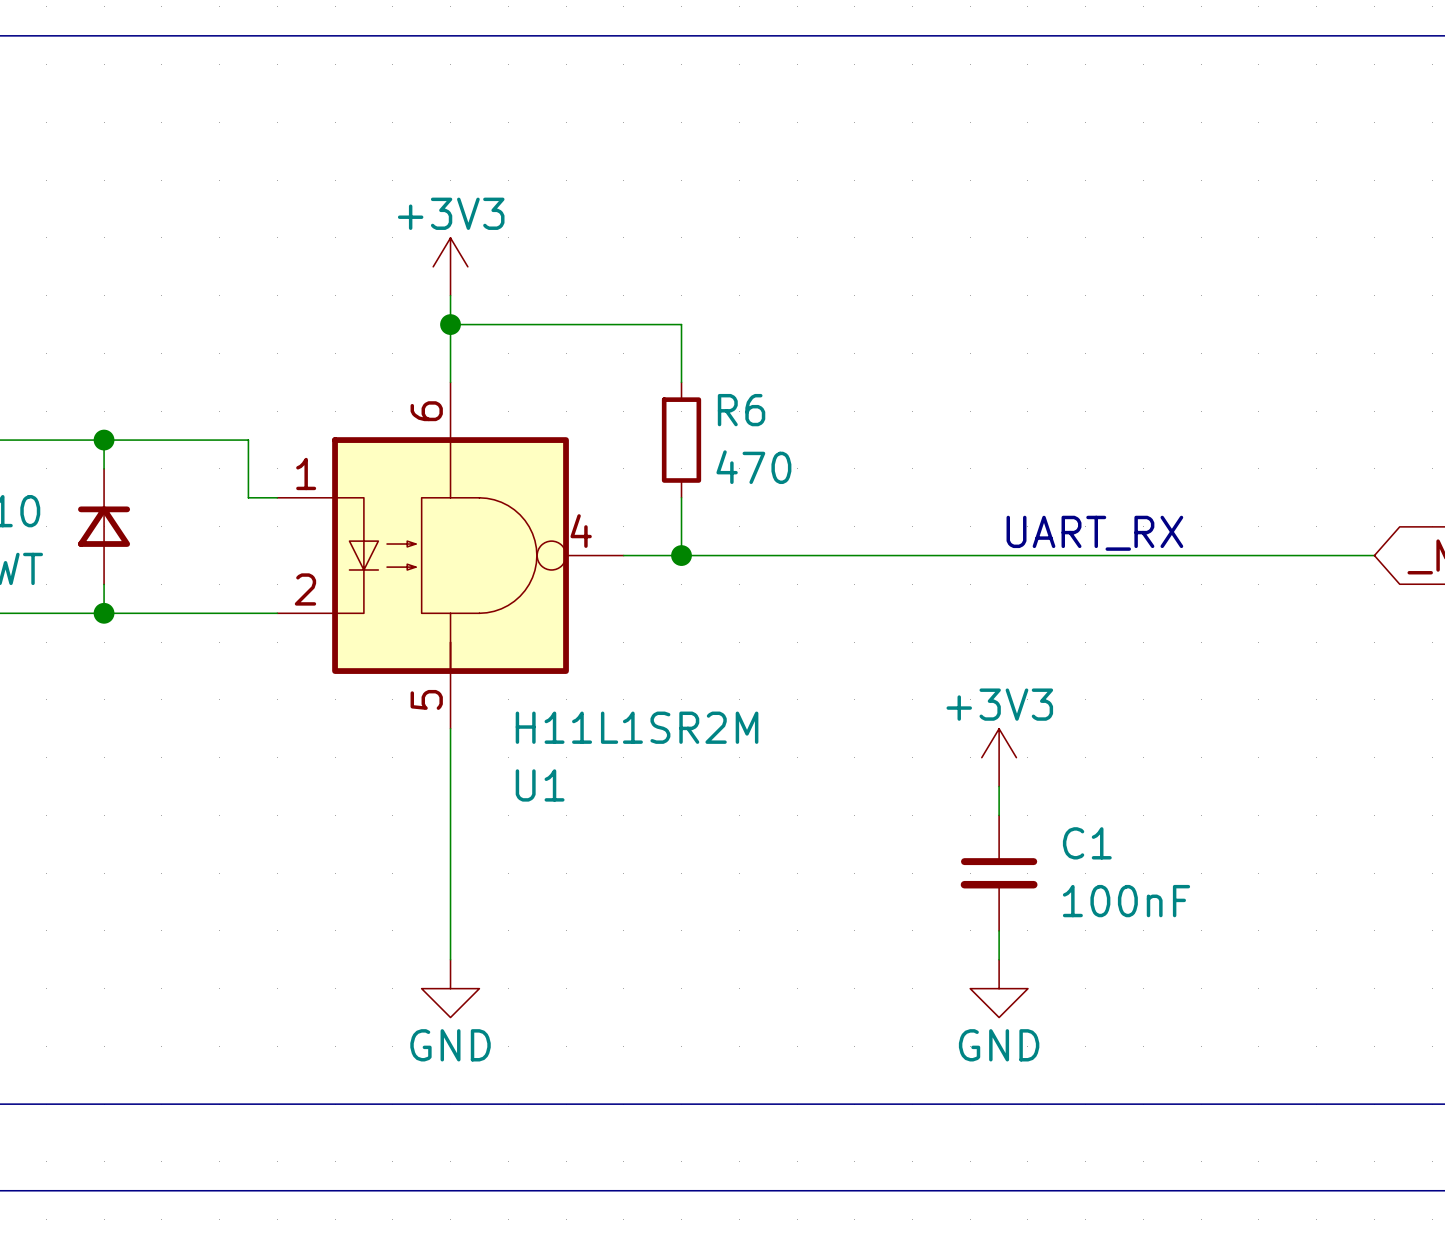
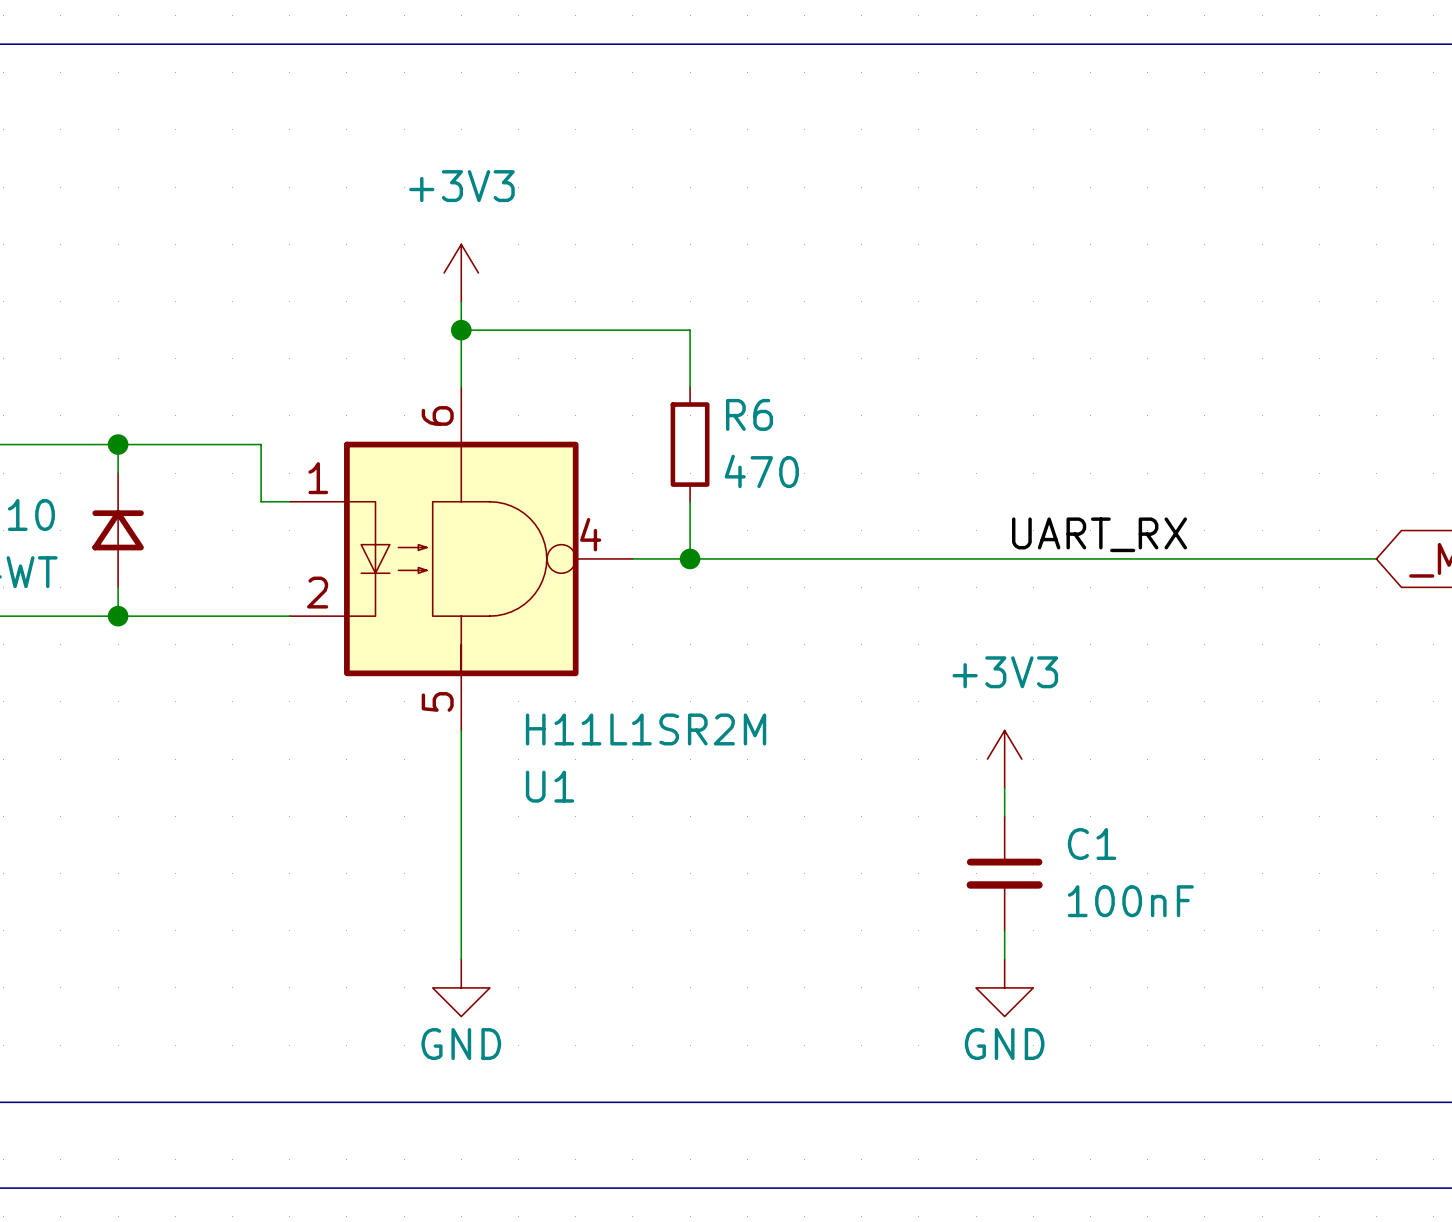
power symbol text position: +3V3 (451, 213) -> +3V3 (461, 186)
label: none -> UART_RX (1099, 534)
text: UART_RX (1094, 533) -> none
power symbol text position: +3V3 (999, 704) -> +3V3 (1005, 672)

